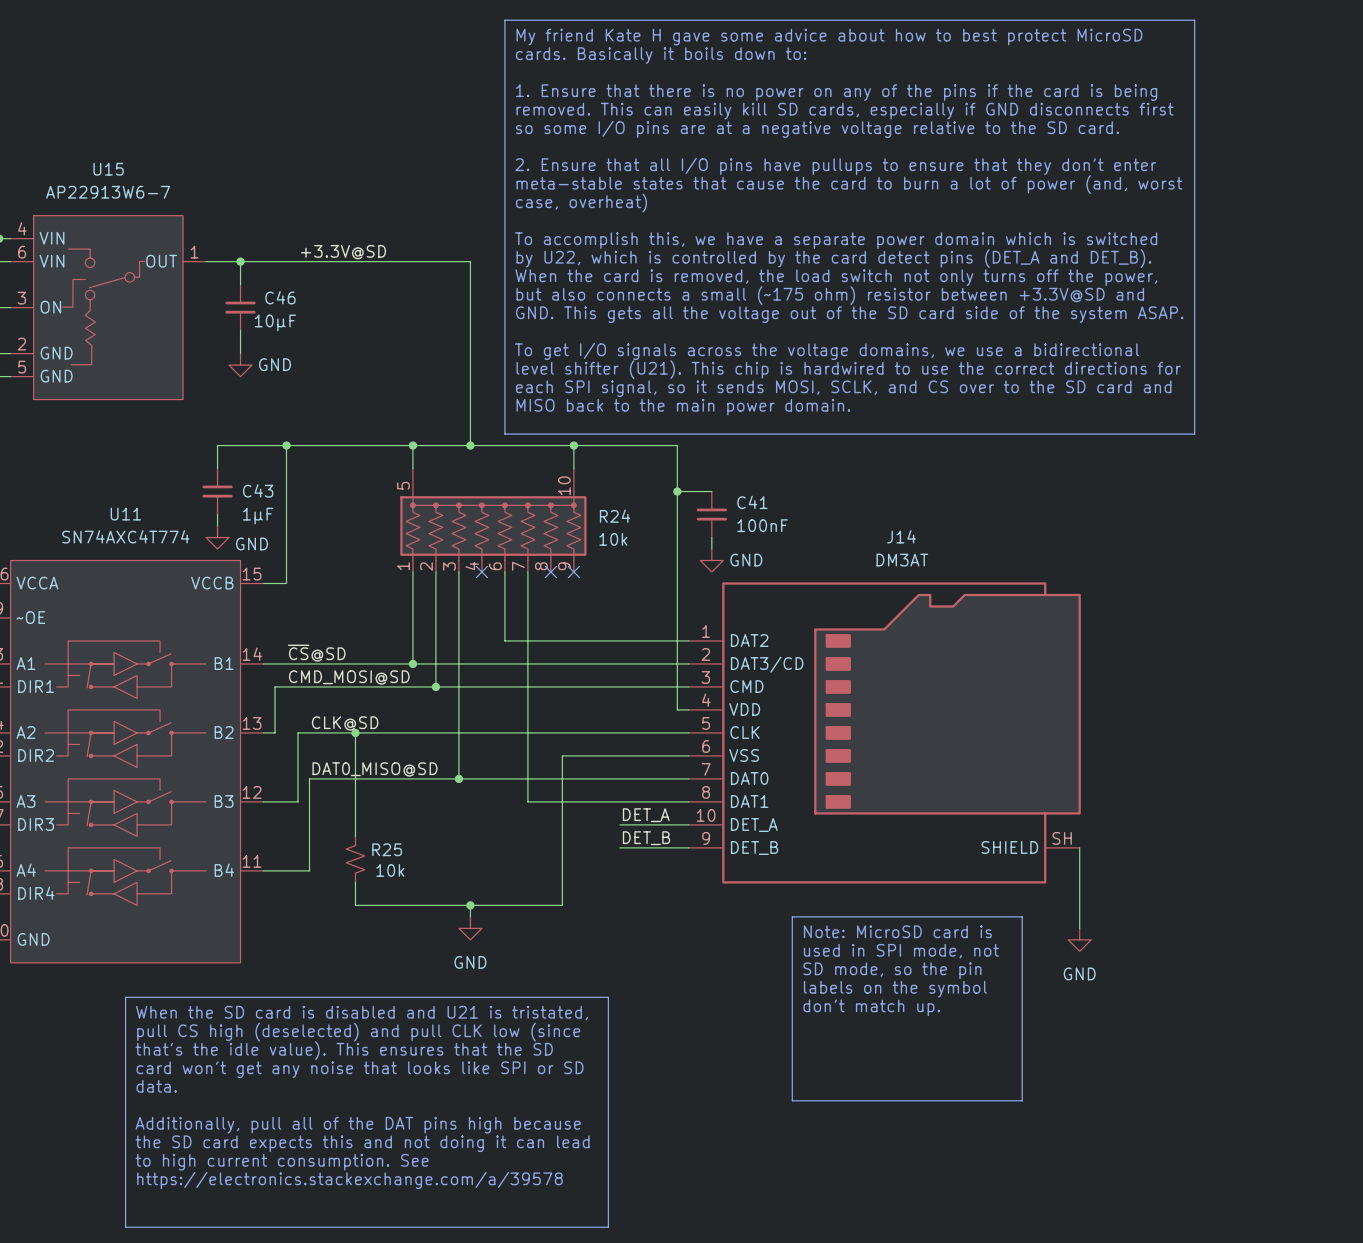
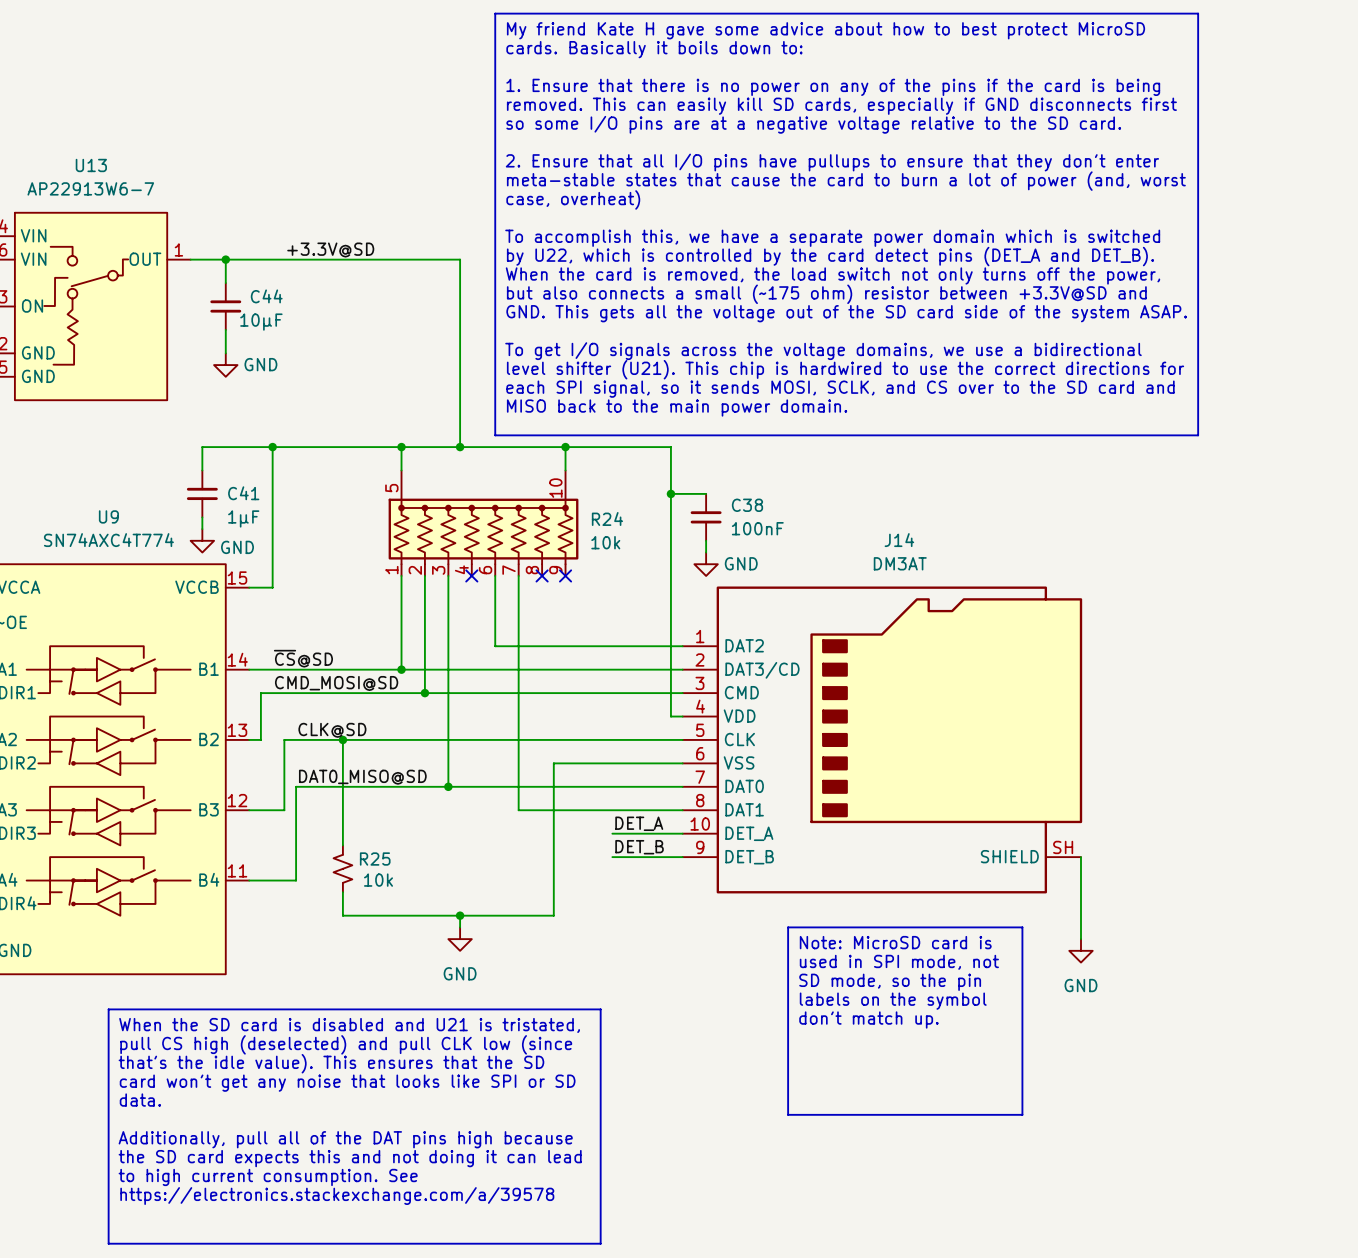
U15 name: U15 (108, 169) -> U13 (91, 165)
C46 name: C46 (280, 297) -> C44 (266, 296)
C43 name: C43 (258, 490) -> C41 (243, 493)
C41 name: C41 (752, 502) -> C38 (747, 505)
U11 name: U11 (125, 514) -> U9 (108, 516)

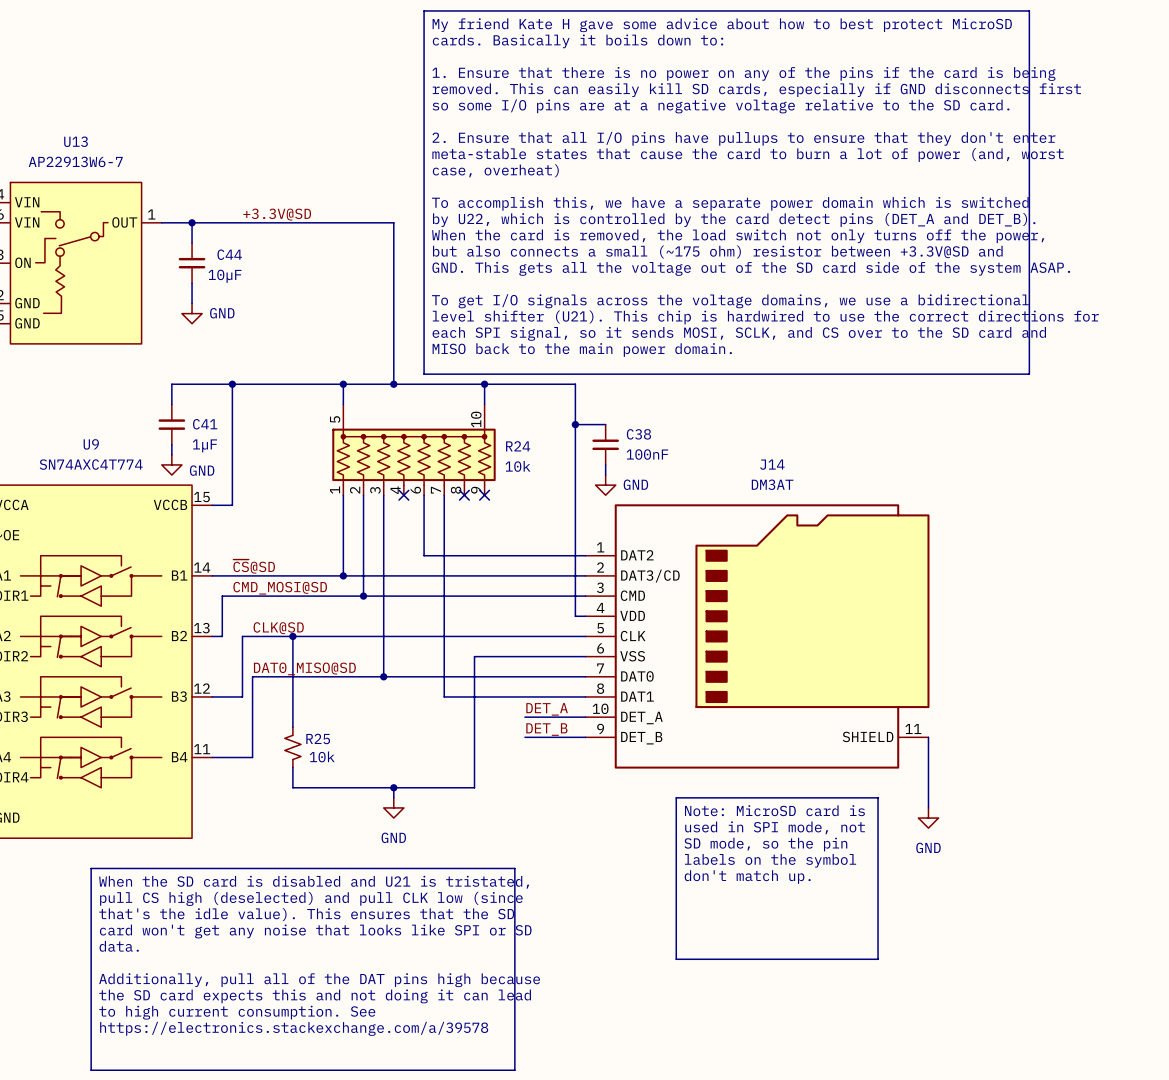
J14 pin number: SH (1063, 847) -> 11 (913, 729)

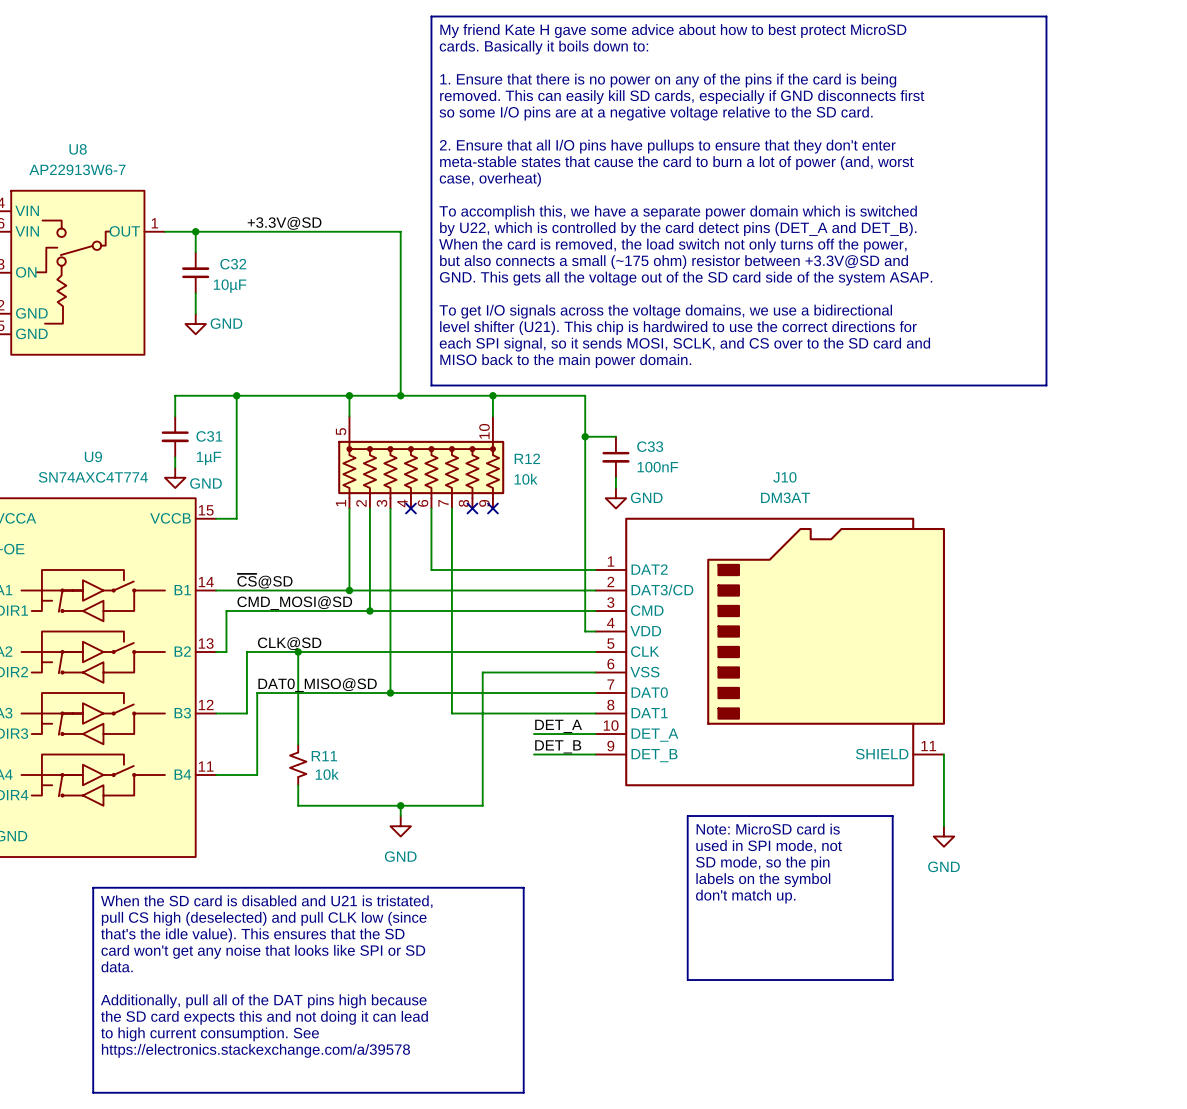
U13 name: U13 (76, 141) -> U8 (78, 149)
C44: 10µF (192, 263) -> none
C32: none -> 10µF (195, 272)
C41: 1µF (171, 424) -> none
C31: none -> 1µF (175, 436)
C38: 100nF (605, 444) -> none
C33: none -> 100nF (615, 457)
R24 name: R24 (518, 446) -> R12 (527, 458)
J14 name: J14 (772, 464) -> J10 (784, 477)
R25 name: R25 (318, 738) -> R11 (324, 756)

